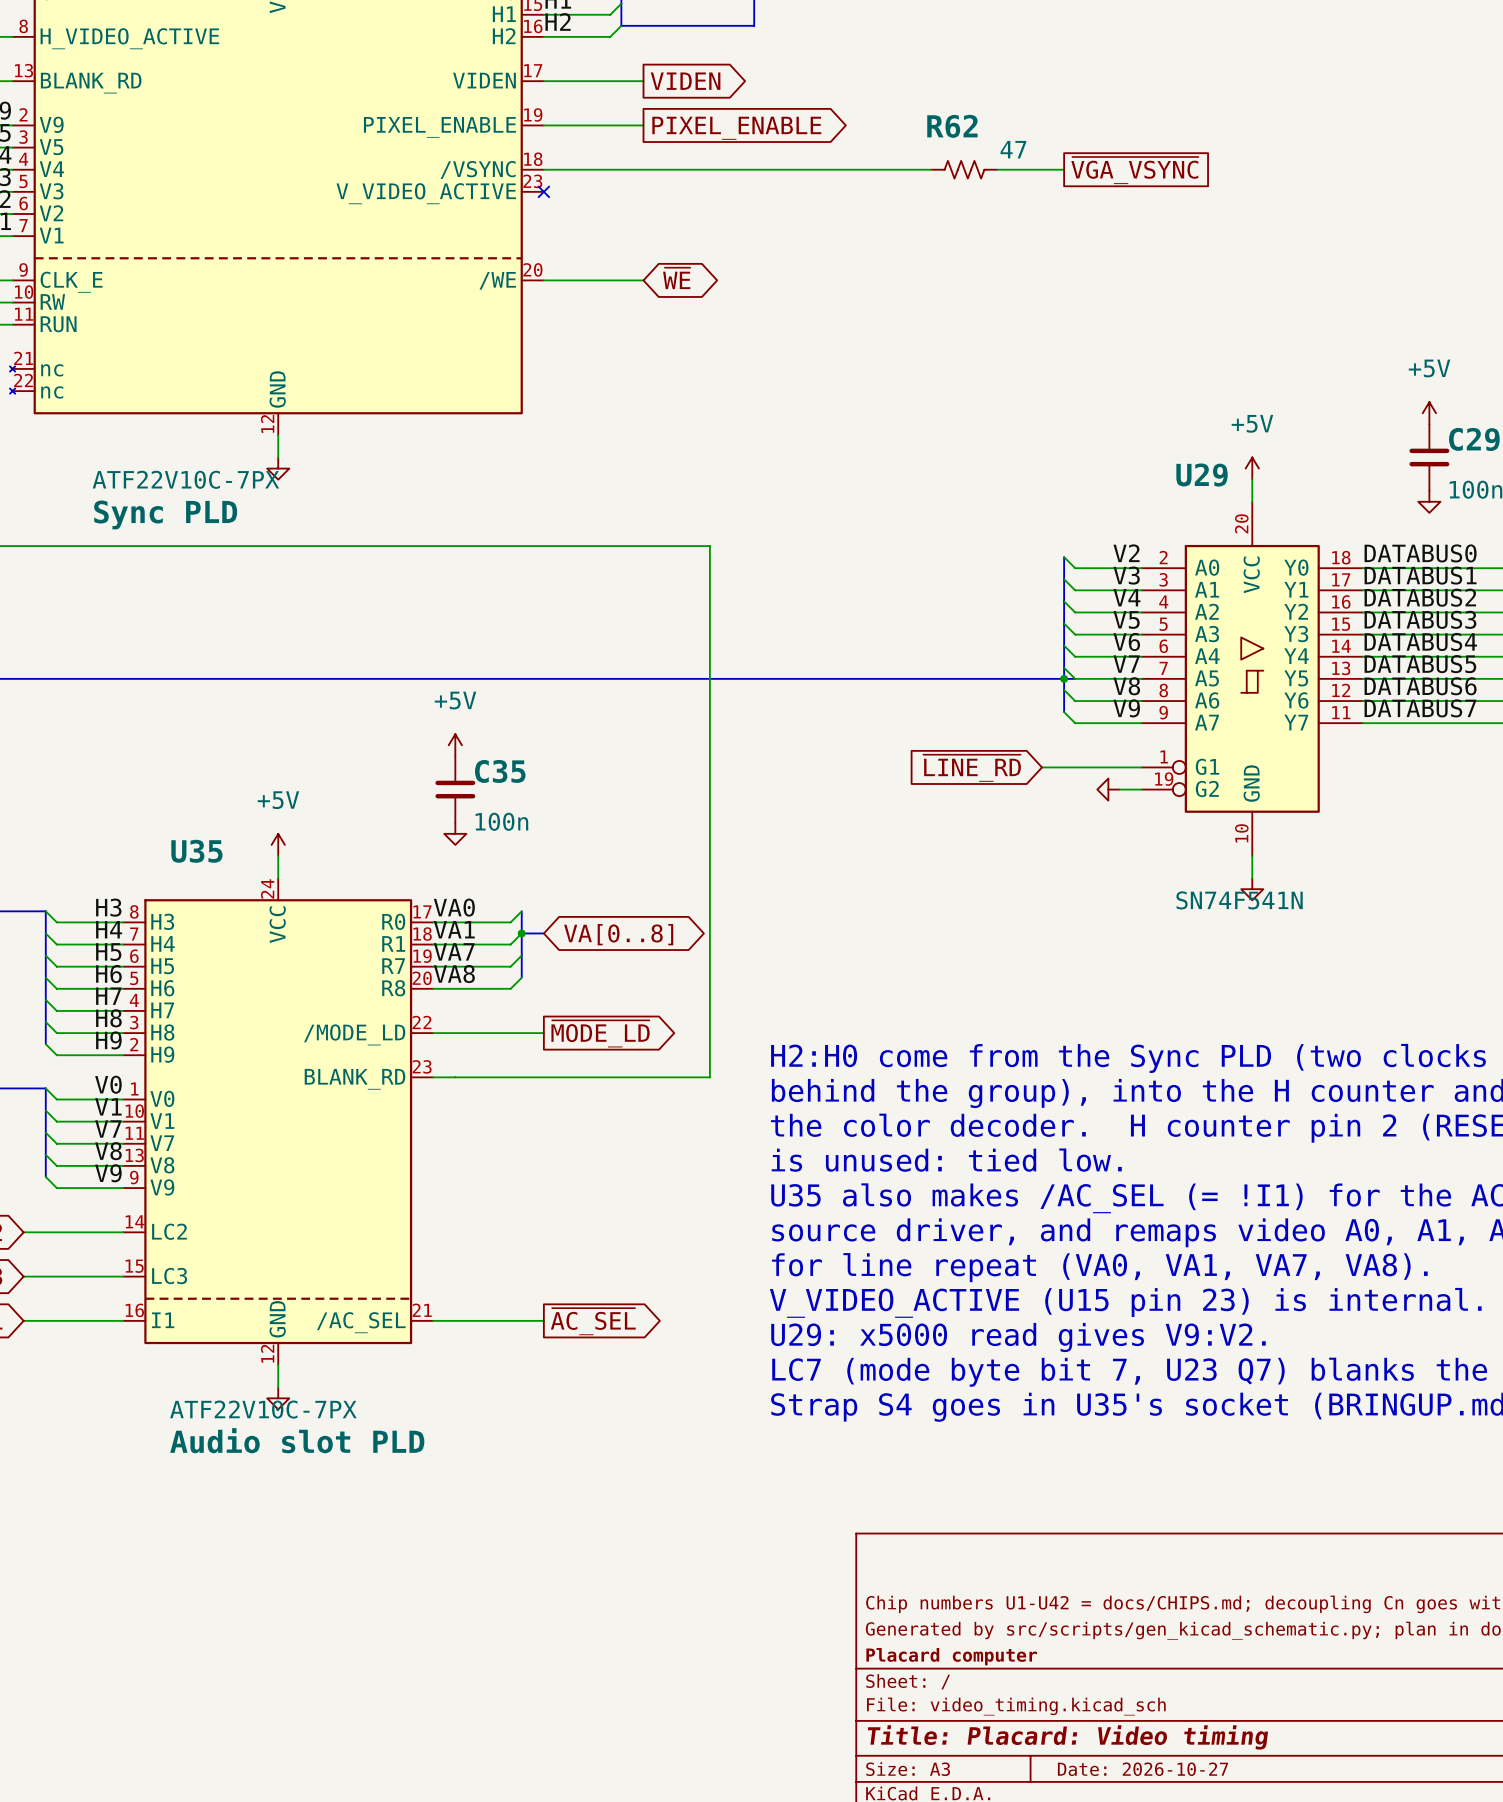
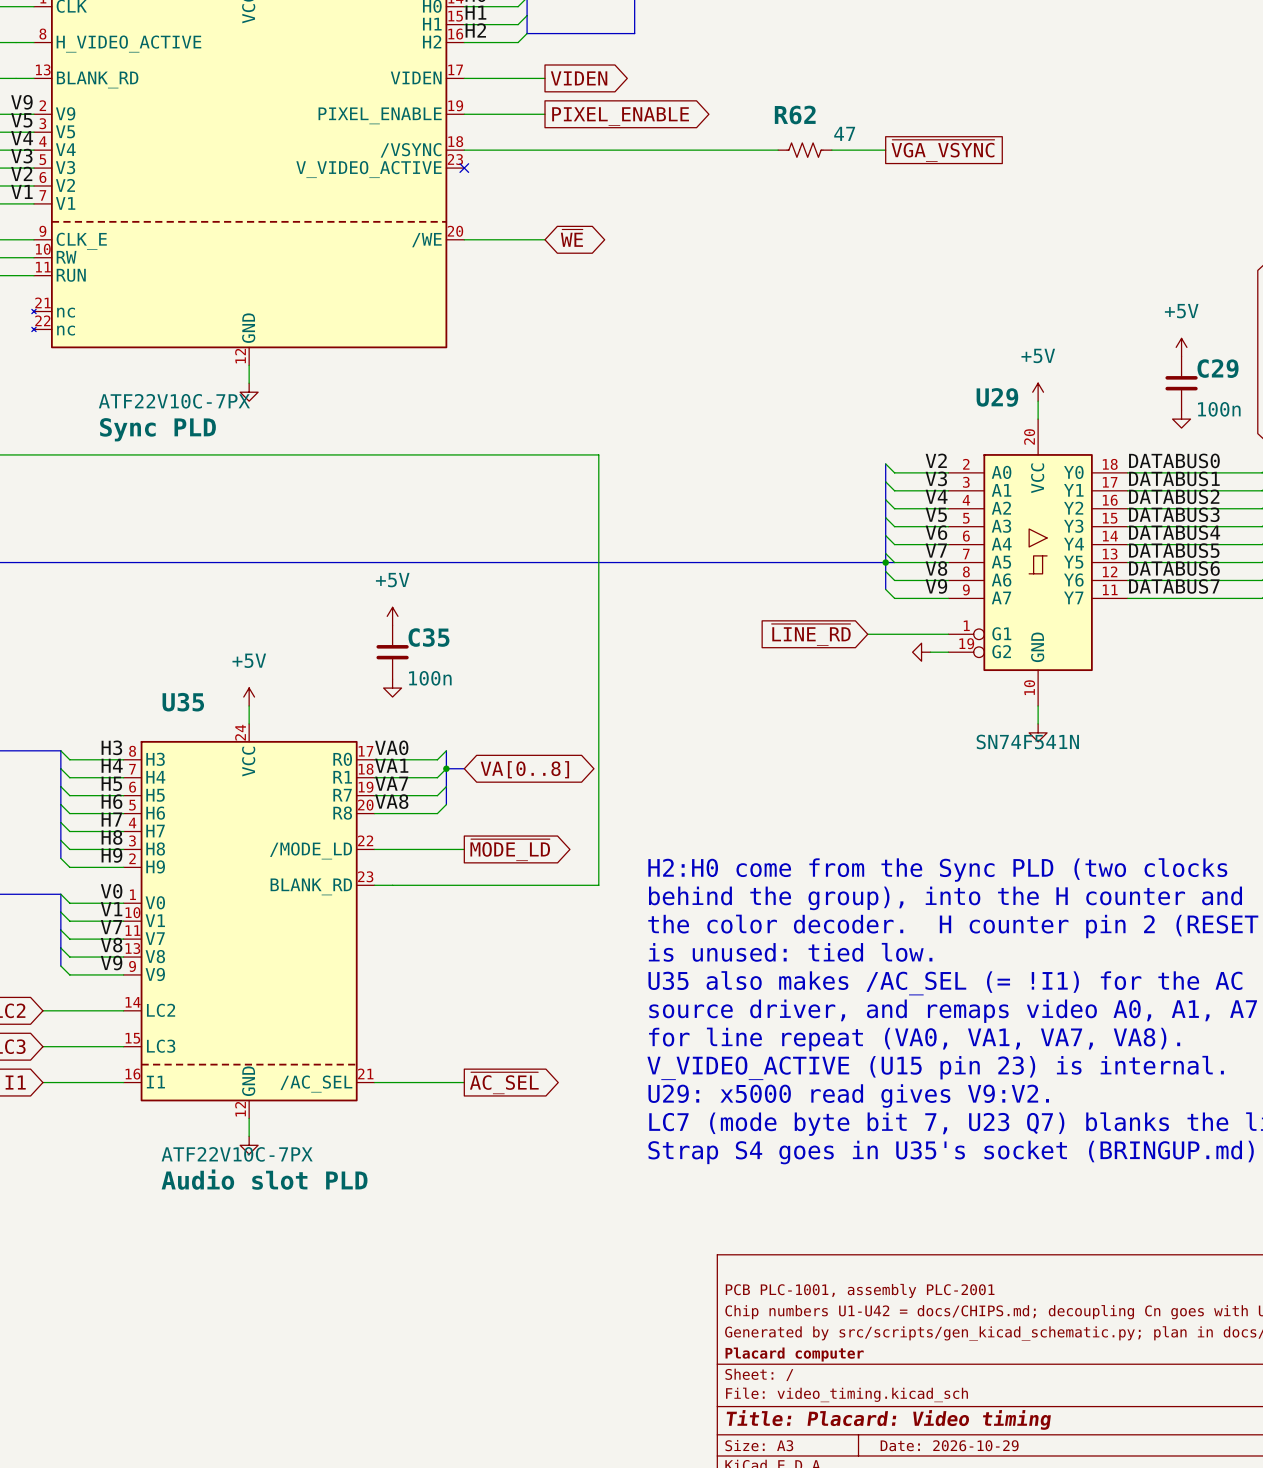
title block: none -> PCB PLC-1001, assembly PLC-2001 (860, 1290)
title block: Date: 2026-10-27 (1142, 1769) -> Date: 2026-10-29 (949, 1445)

